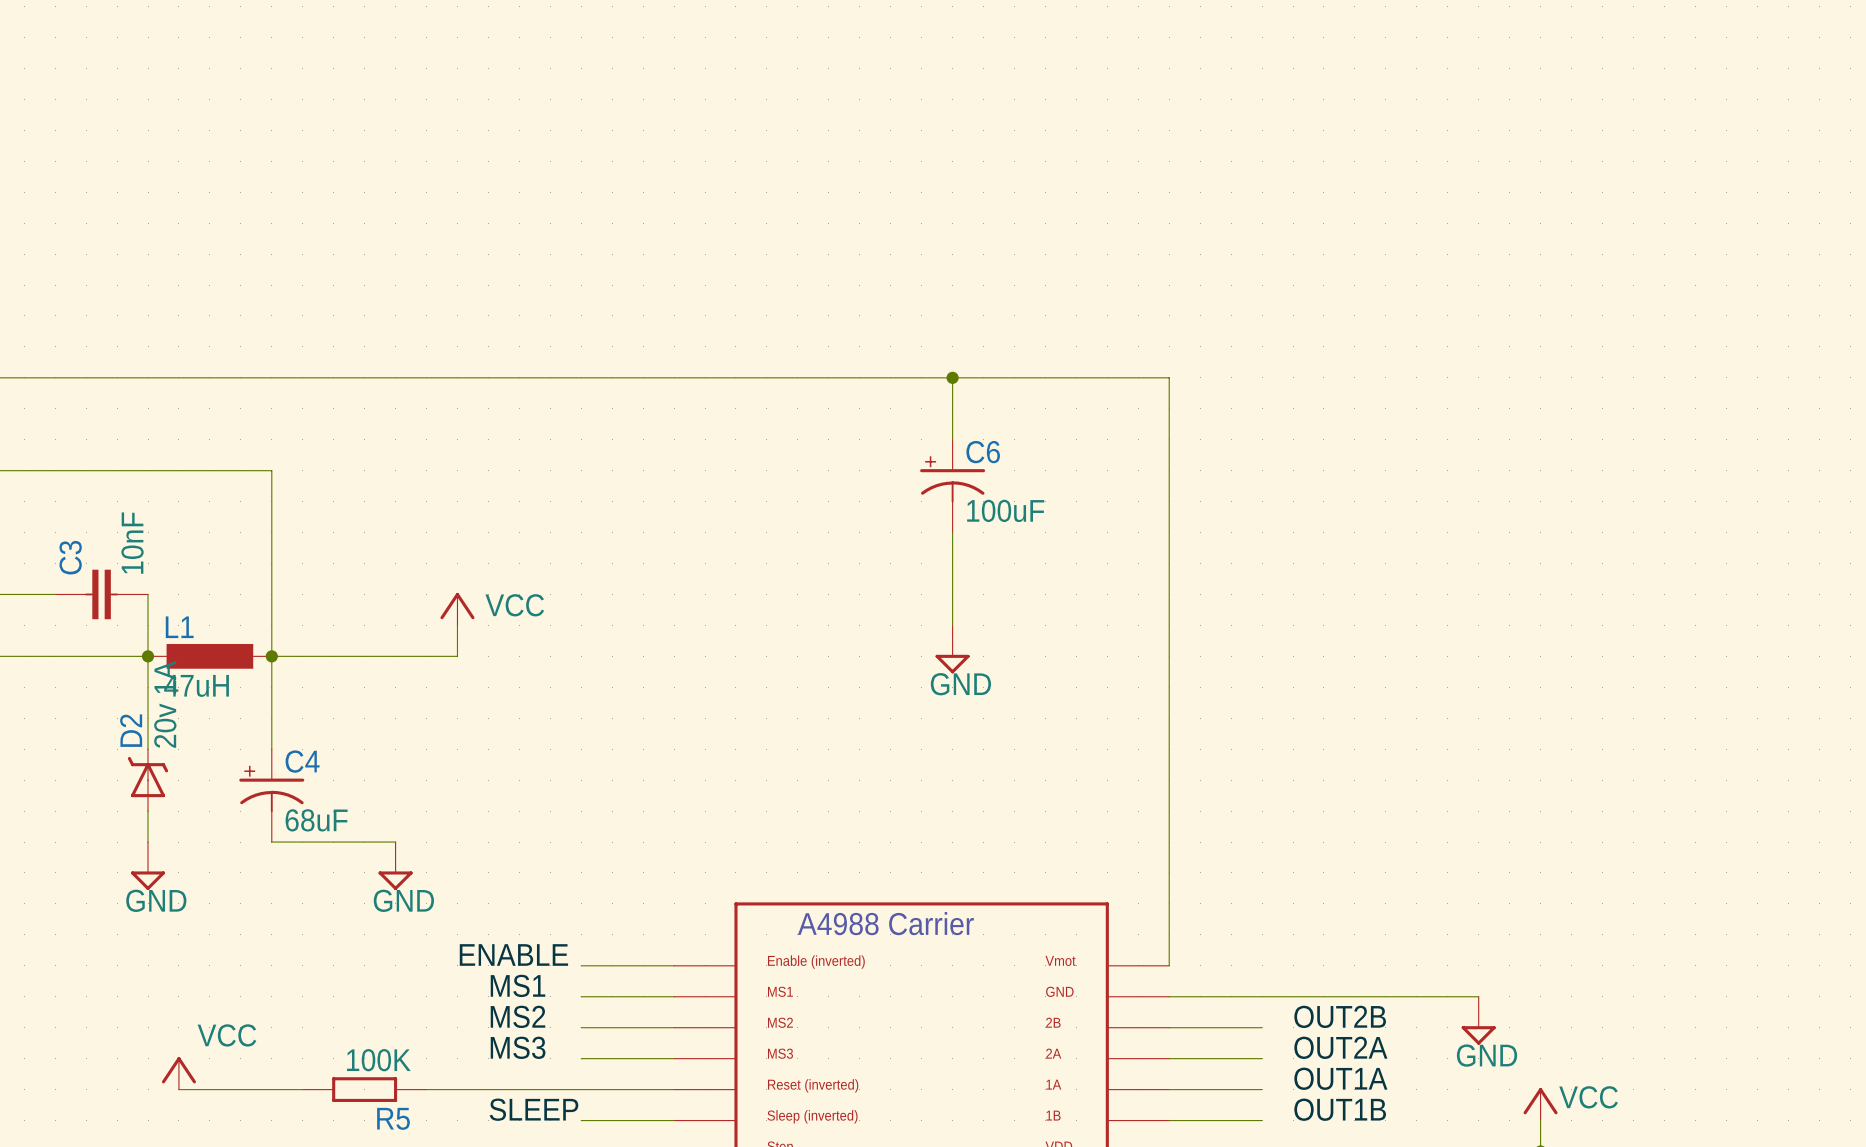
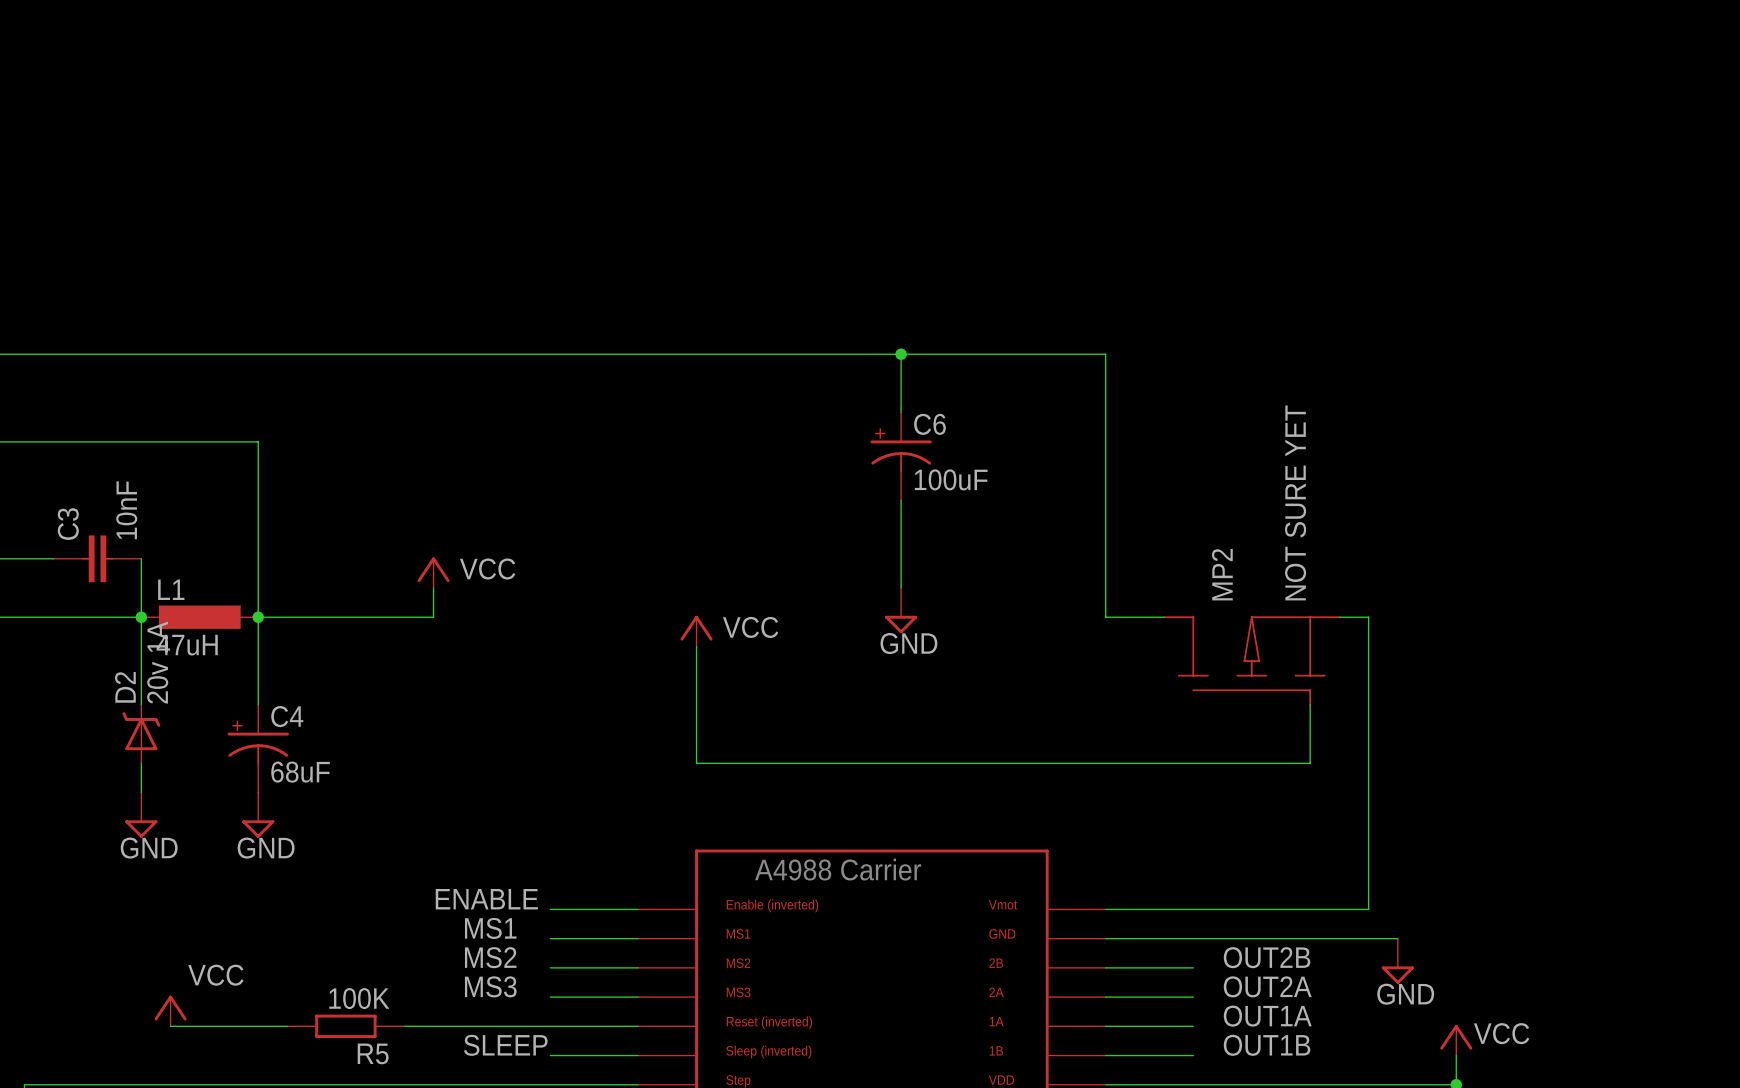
wire: (1169, 656) (1169, 965) -> (1339, 617) (1368, 617) (1368, 909) (1105, 909)
wire: none -> (1105, 617) (1164, 617)
power symbol: none -> VCC (696, 631)
wire: none -> (696, 646) (696, 763) (1310, 763) (1310, 704)
MP2: none -> NOT SURE YET (1251, 661)
wire: (271, 842) (395, 842) -> none
power symbol position: GND (395, 866) -> GND (258, 815)

